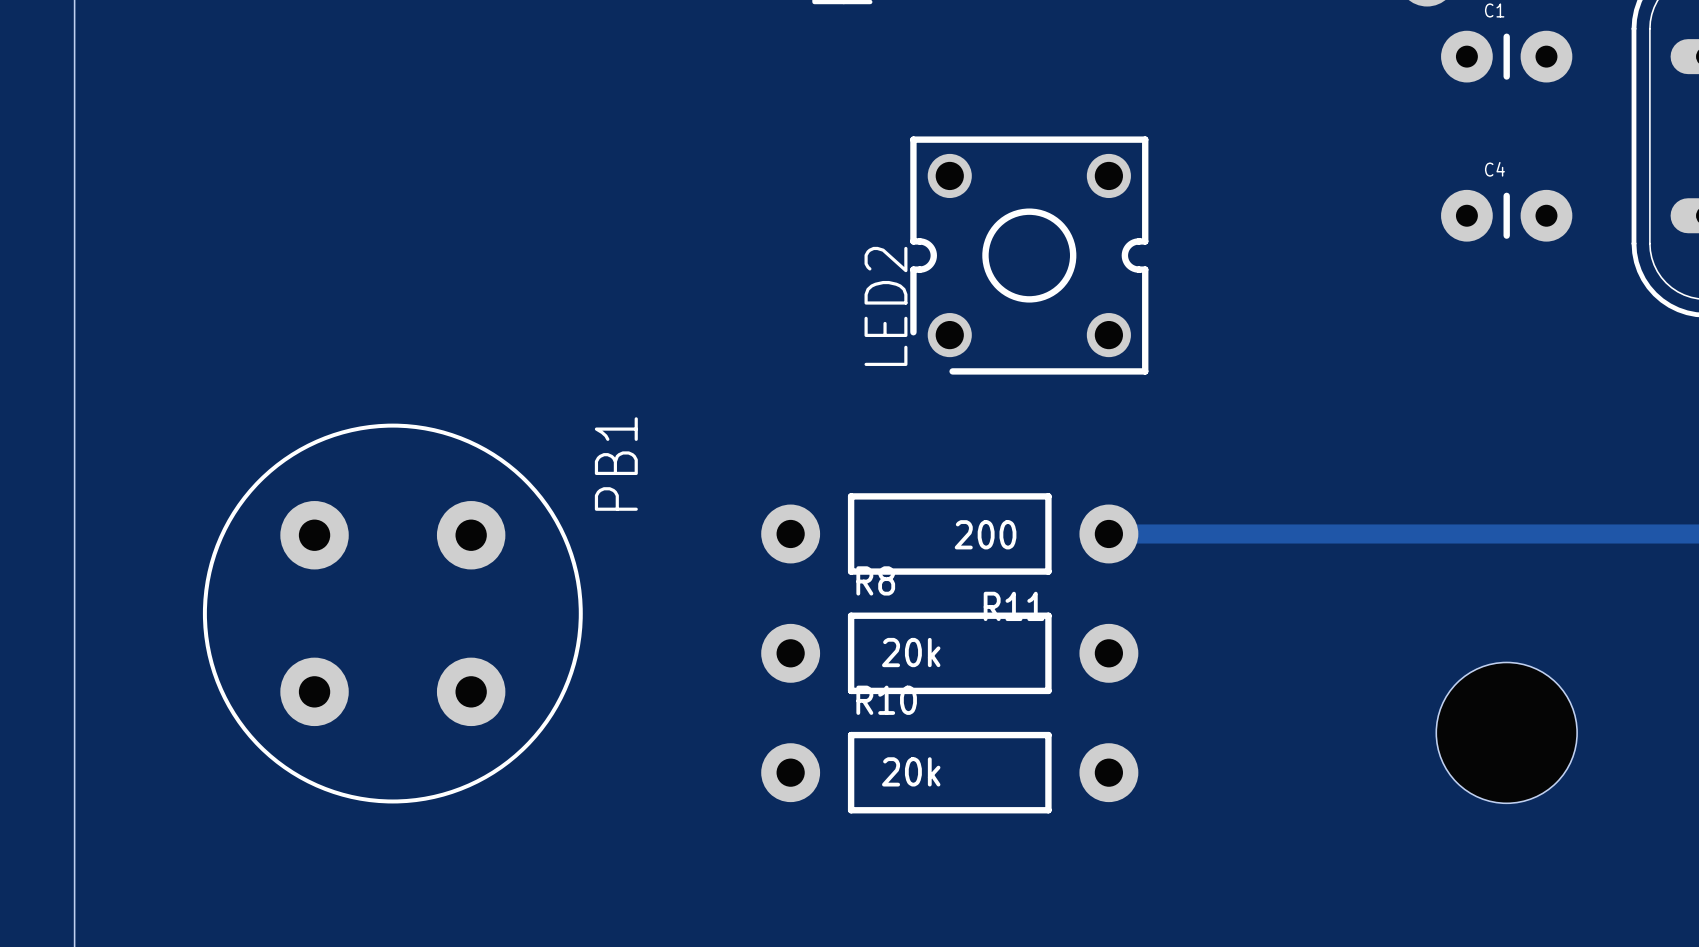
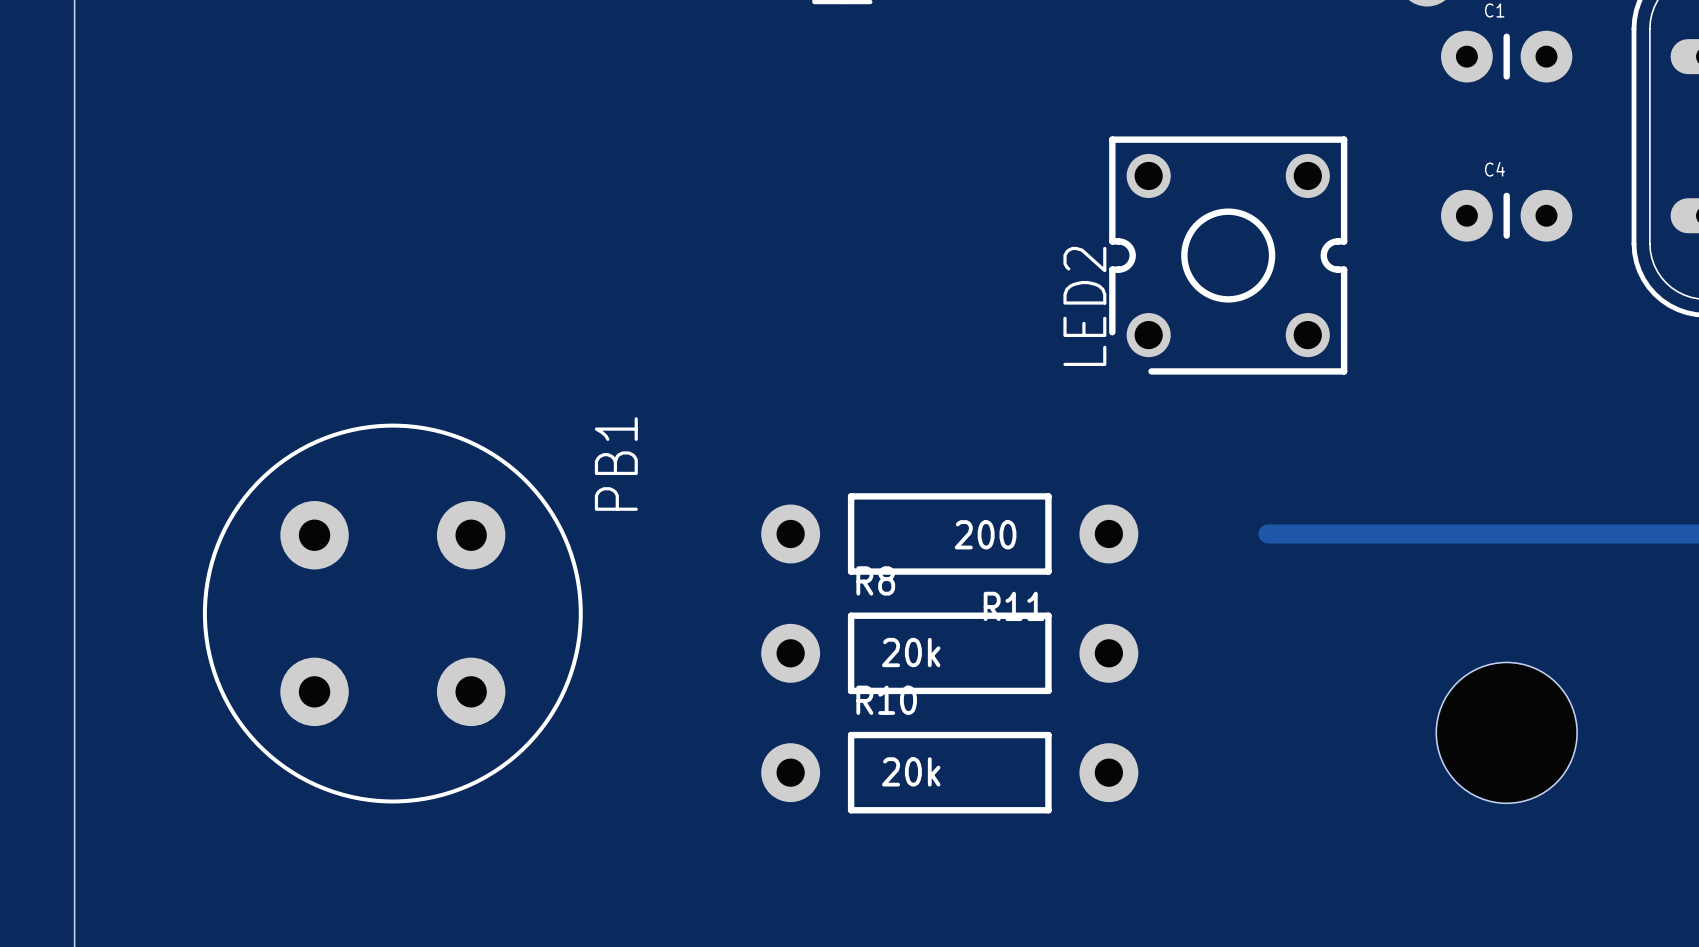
LED2 position: (1029, 255) -> (1228, 255)
track: (1108, 533) (1268, 533) -> none

